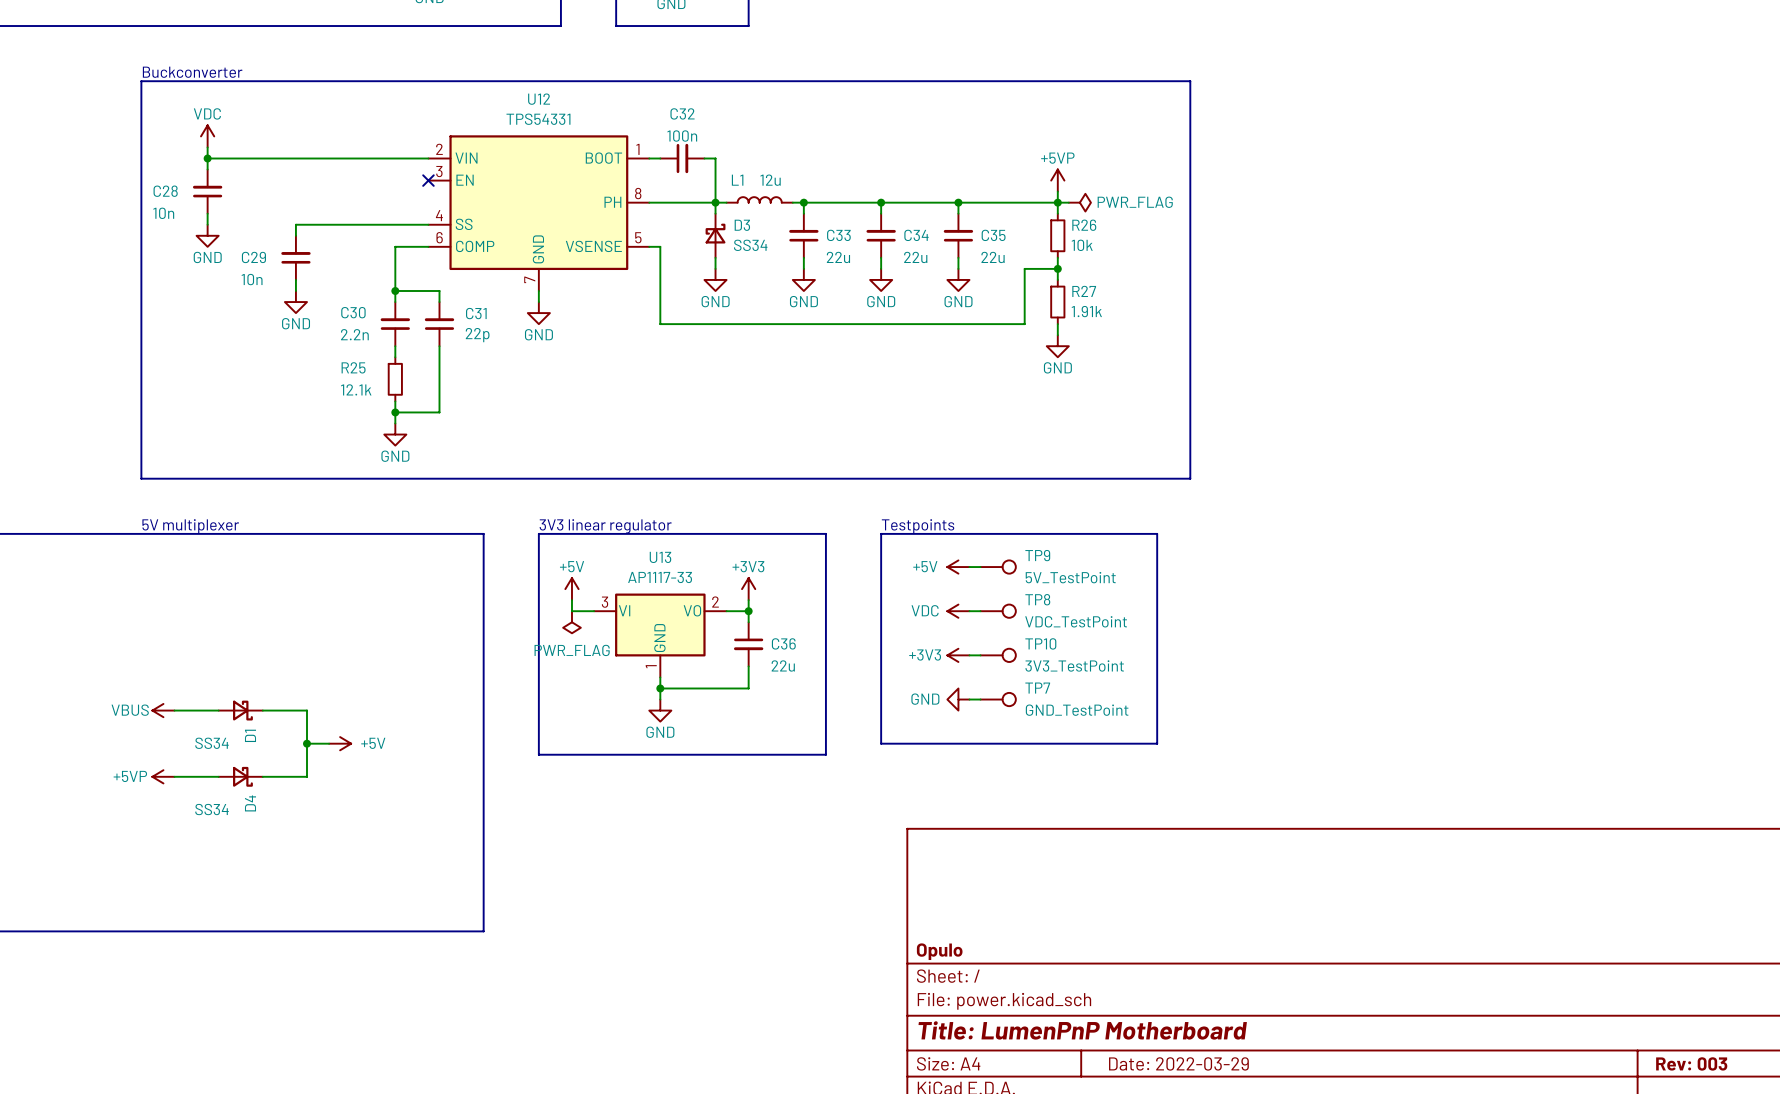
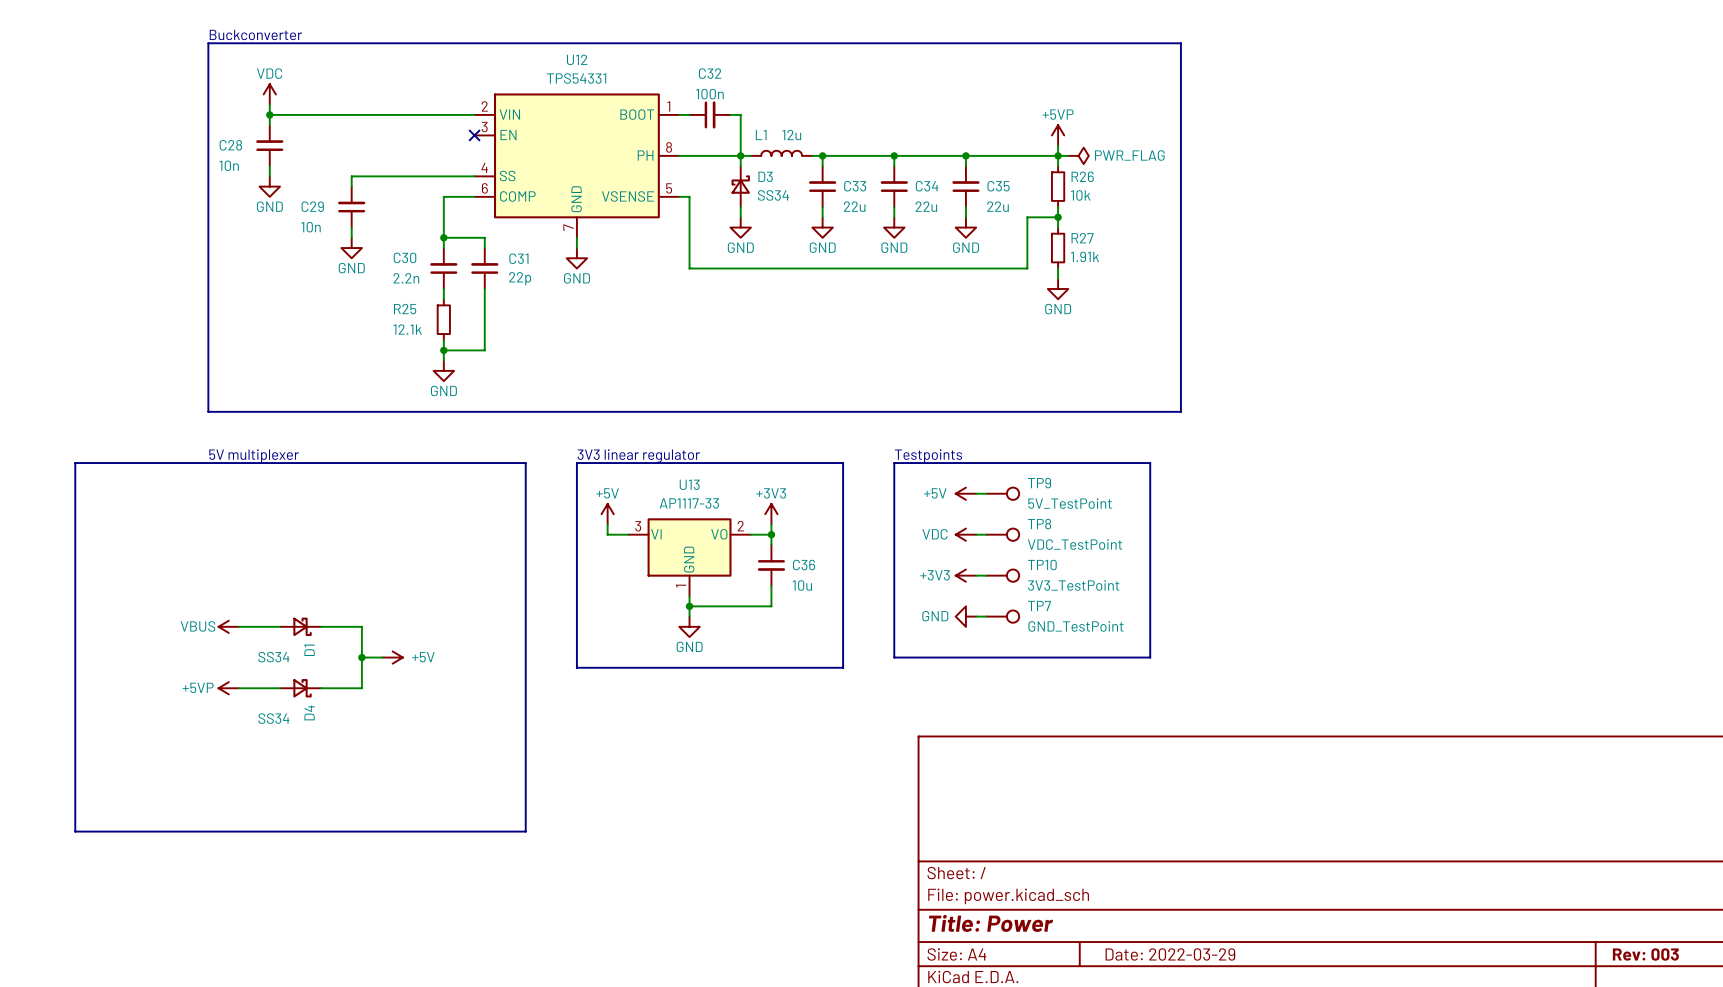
power symbol: PWR_FLAG (571, 622) -> none
C36 value: 22u (783, 665) -> 10u (802, 585)
title block: Opulo (939, 951) -> none
title block: Title: LumenPnP Motherboard (1082, 1030) -> Title: Power (991, 923)

